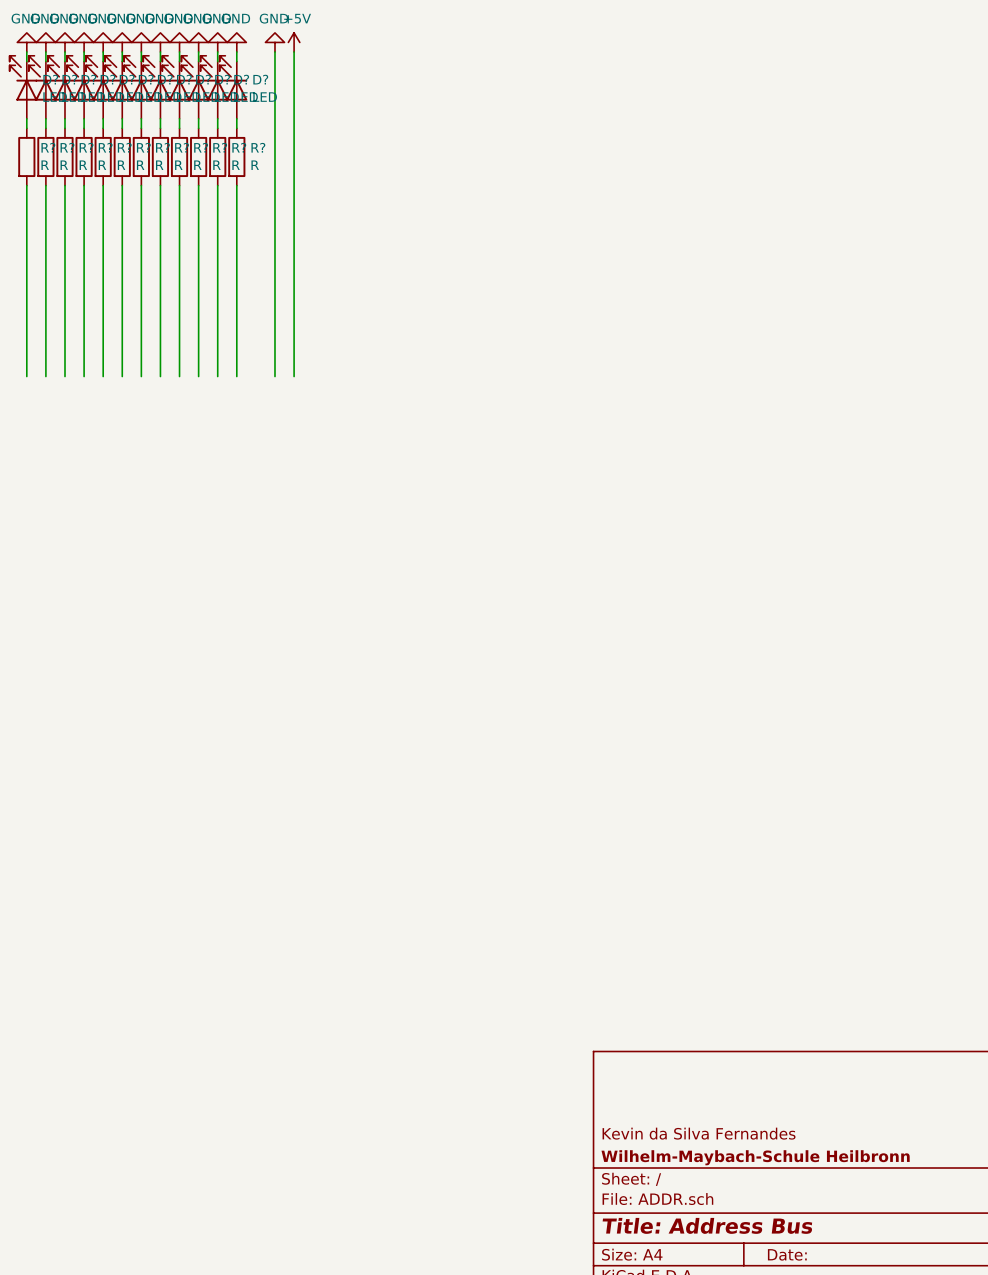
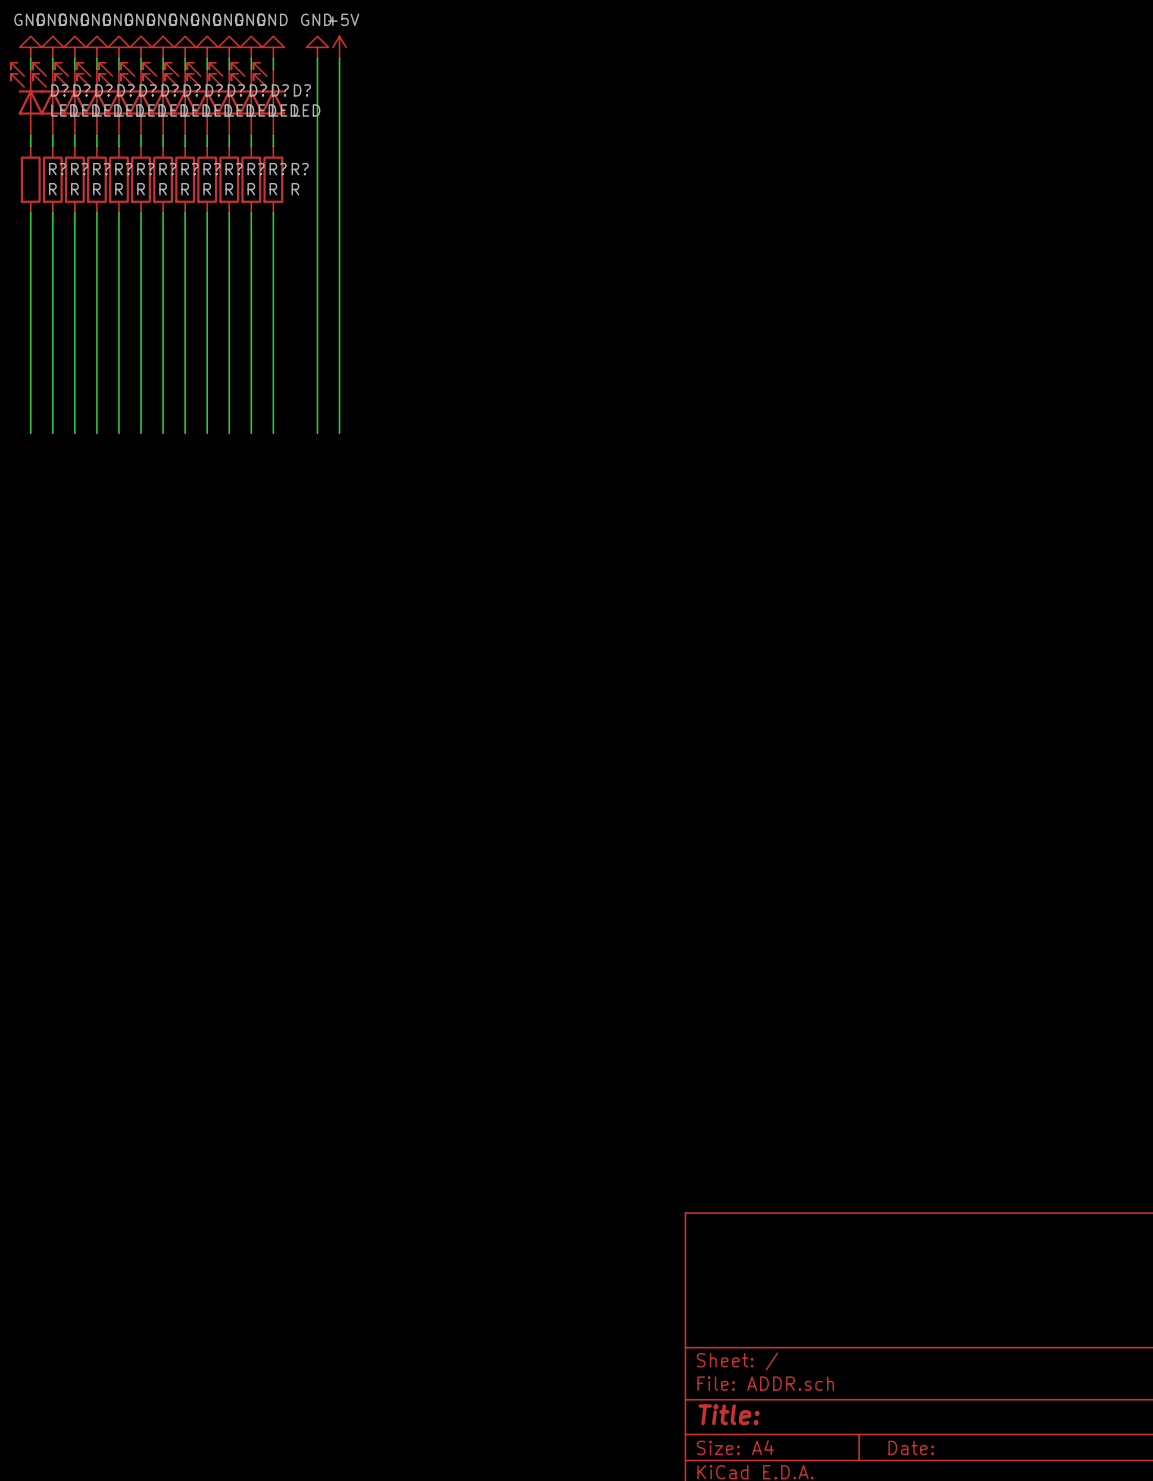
title block: Kevin da Silva Fernandes (699, 1133) -> none
title block: Wilhelm-Maybach-Schule Heilbronn (755, 1157) -> none
title block: Title: Address Bus (707, 1225) -> Title: (729, 1414)

